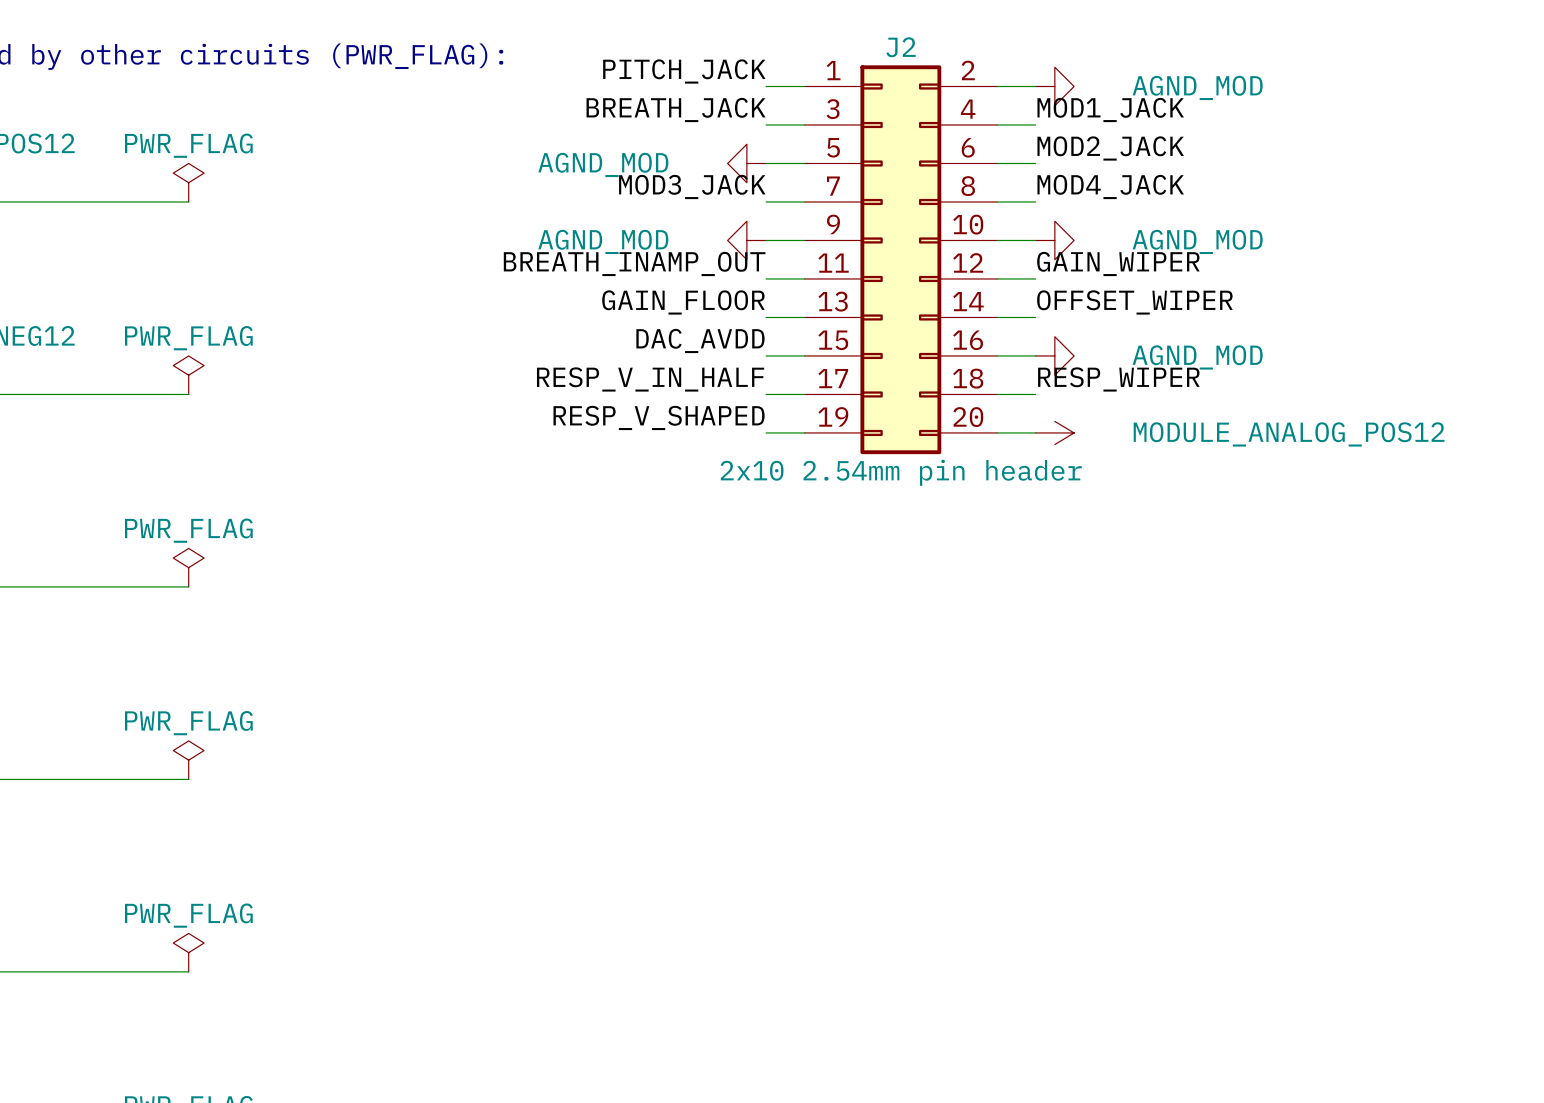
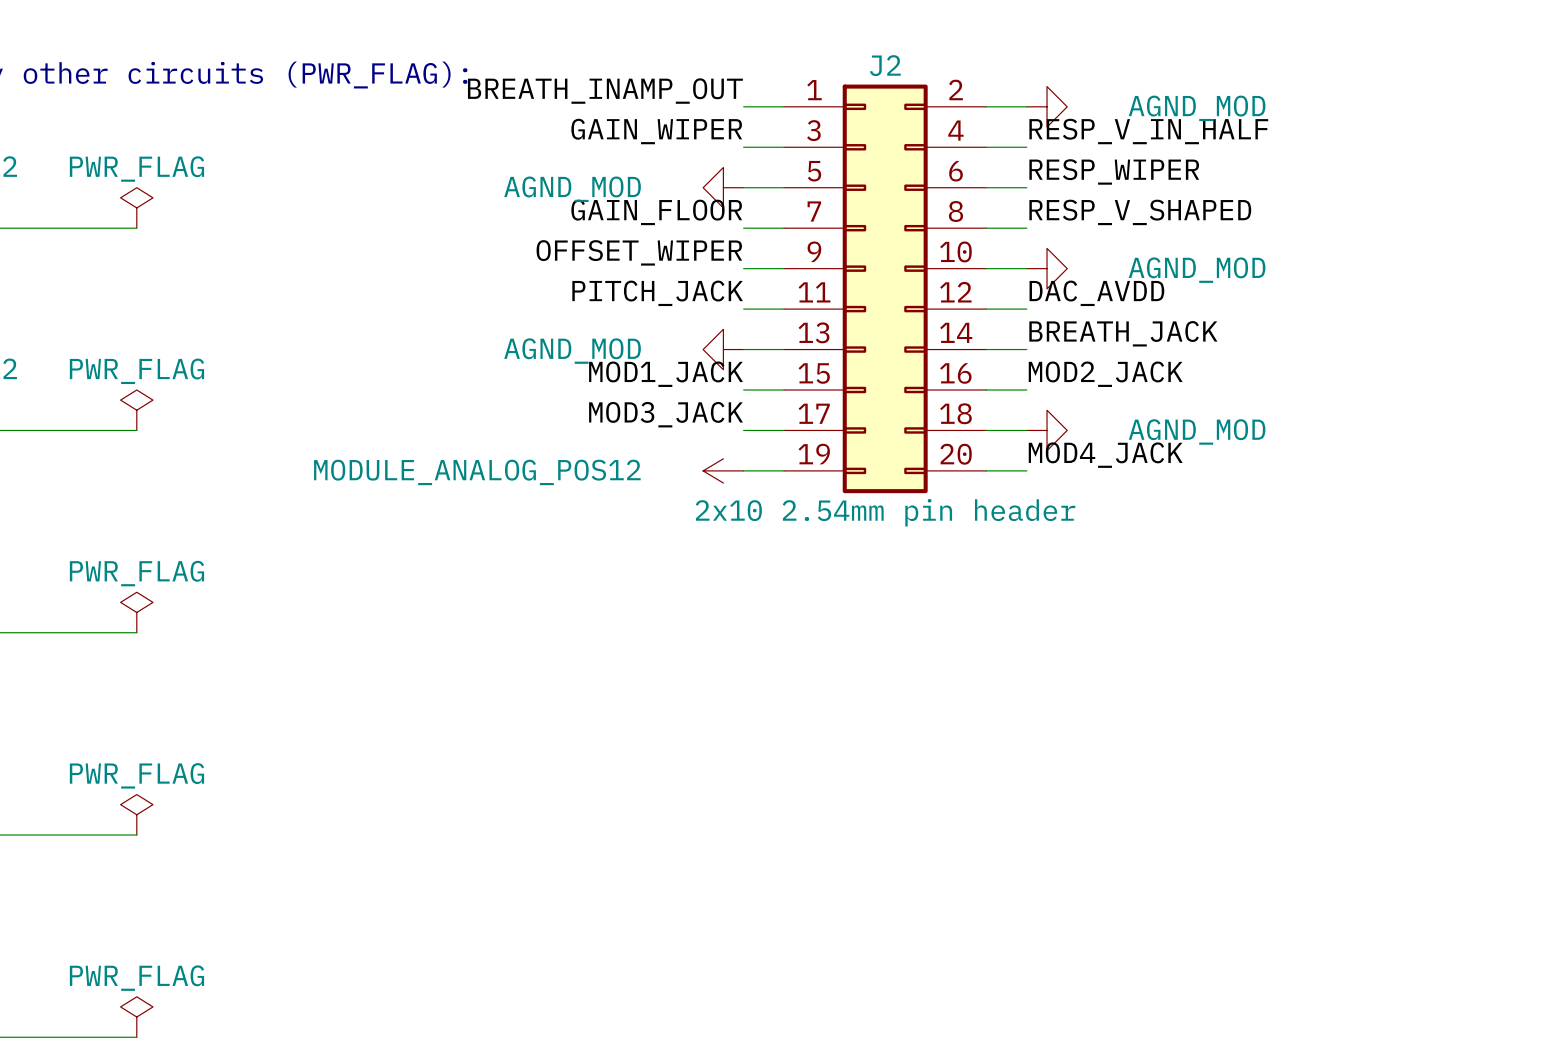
label: PITCH_JACK (684, 71) -> BREATH_INAMP_OUT (605, 91)
label: BREATH_JACK (676, 109) -> GAIN_WIPER (656, 131)
label: MOD1_JACK (1110, 109) -> RESP_V_IN_HALF (1148, 131)
label: MOD2_JACK (1110, 148) -> RESP_WIPER (1114, 171)
label: MOD3_JACK (692, 186) -> GAIN_FLOOR (656, 212)
label: MOD4_JACK (1110, 186) -> RESP_V_SHAPED (1140, 212)
label: none -> OFFSET_WIPER (639, 252)
power symbol position: AGND_MOD (746, 240) -> AGND_MOD (723, 349)
label: BREATH_INAMP_OUT (634, 263) -> PITCH_JACK (657, 293)
label: GAIN_WIPER (1118, 263) -> DAC_AVDD (1096, 293)
label: GAIN_FLOOR (683, 302) -> none
label: OFFSET_WIPER (1134, 302) -> BREATH_JACK (1123, 333)
label: DAC_AVDD (700, 340) -> MOD1_JACK (666, 374)
label: none -> MOD2_JACK (1105, 374)
power symbol position: AGND_MOD (1054, 355) -> AGND_MOD (1047, 430)
label: RESP_V_IN_HALF (650, 379) -> MOD3_JACK (666, 414)
label: RESP_WIPER (1118, 379) -> none
label: RESP_V_SHAPED (659, 417) -> none
label: none -> MOD4_JACK (1105, 455)
power symbol rotation: 0° (1054, 432) -> 180° (723, 470)
power symbol position: MODULE_ANALOG_POS12 (1054, 432) -> MODULE_ANALOG_POS12 (723, 470)

